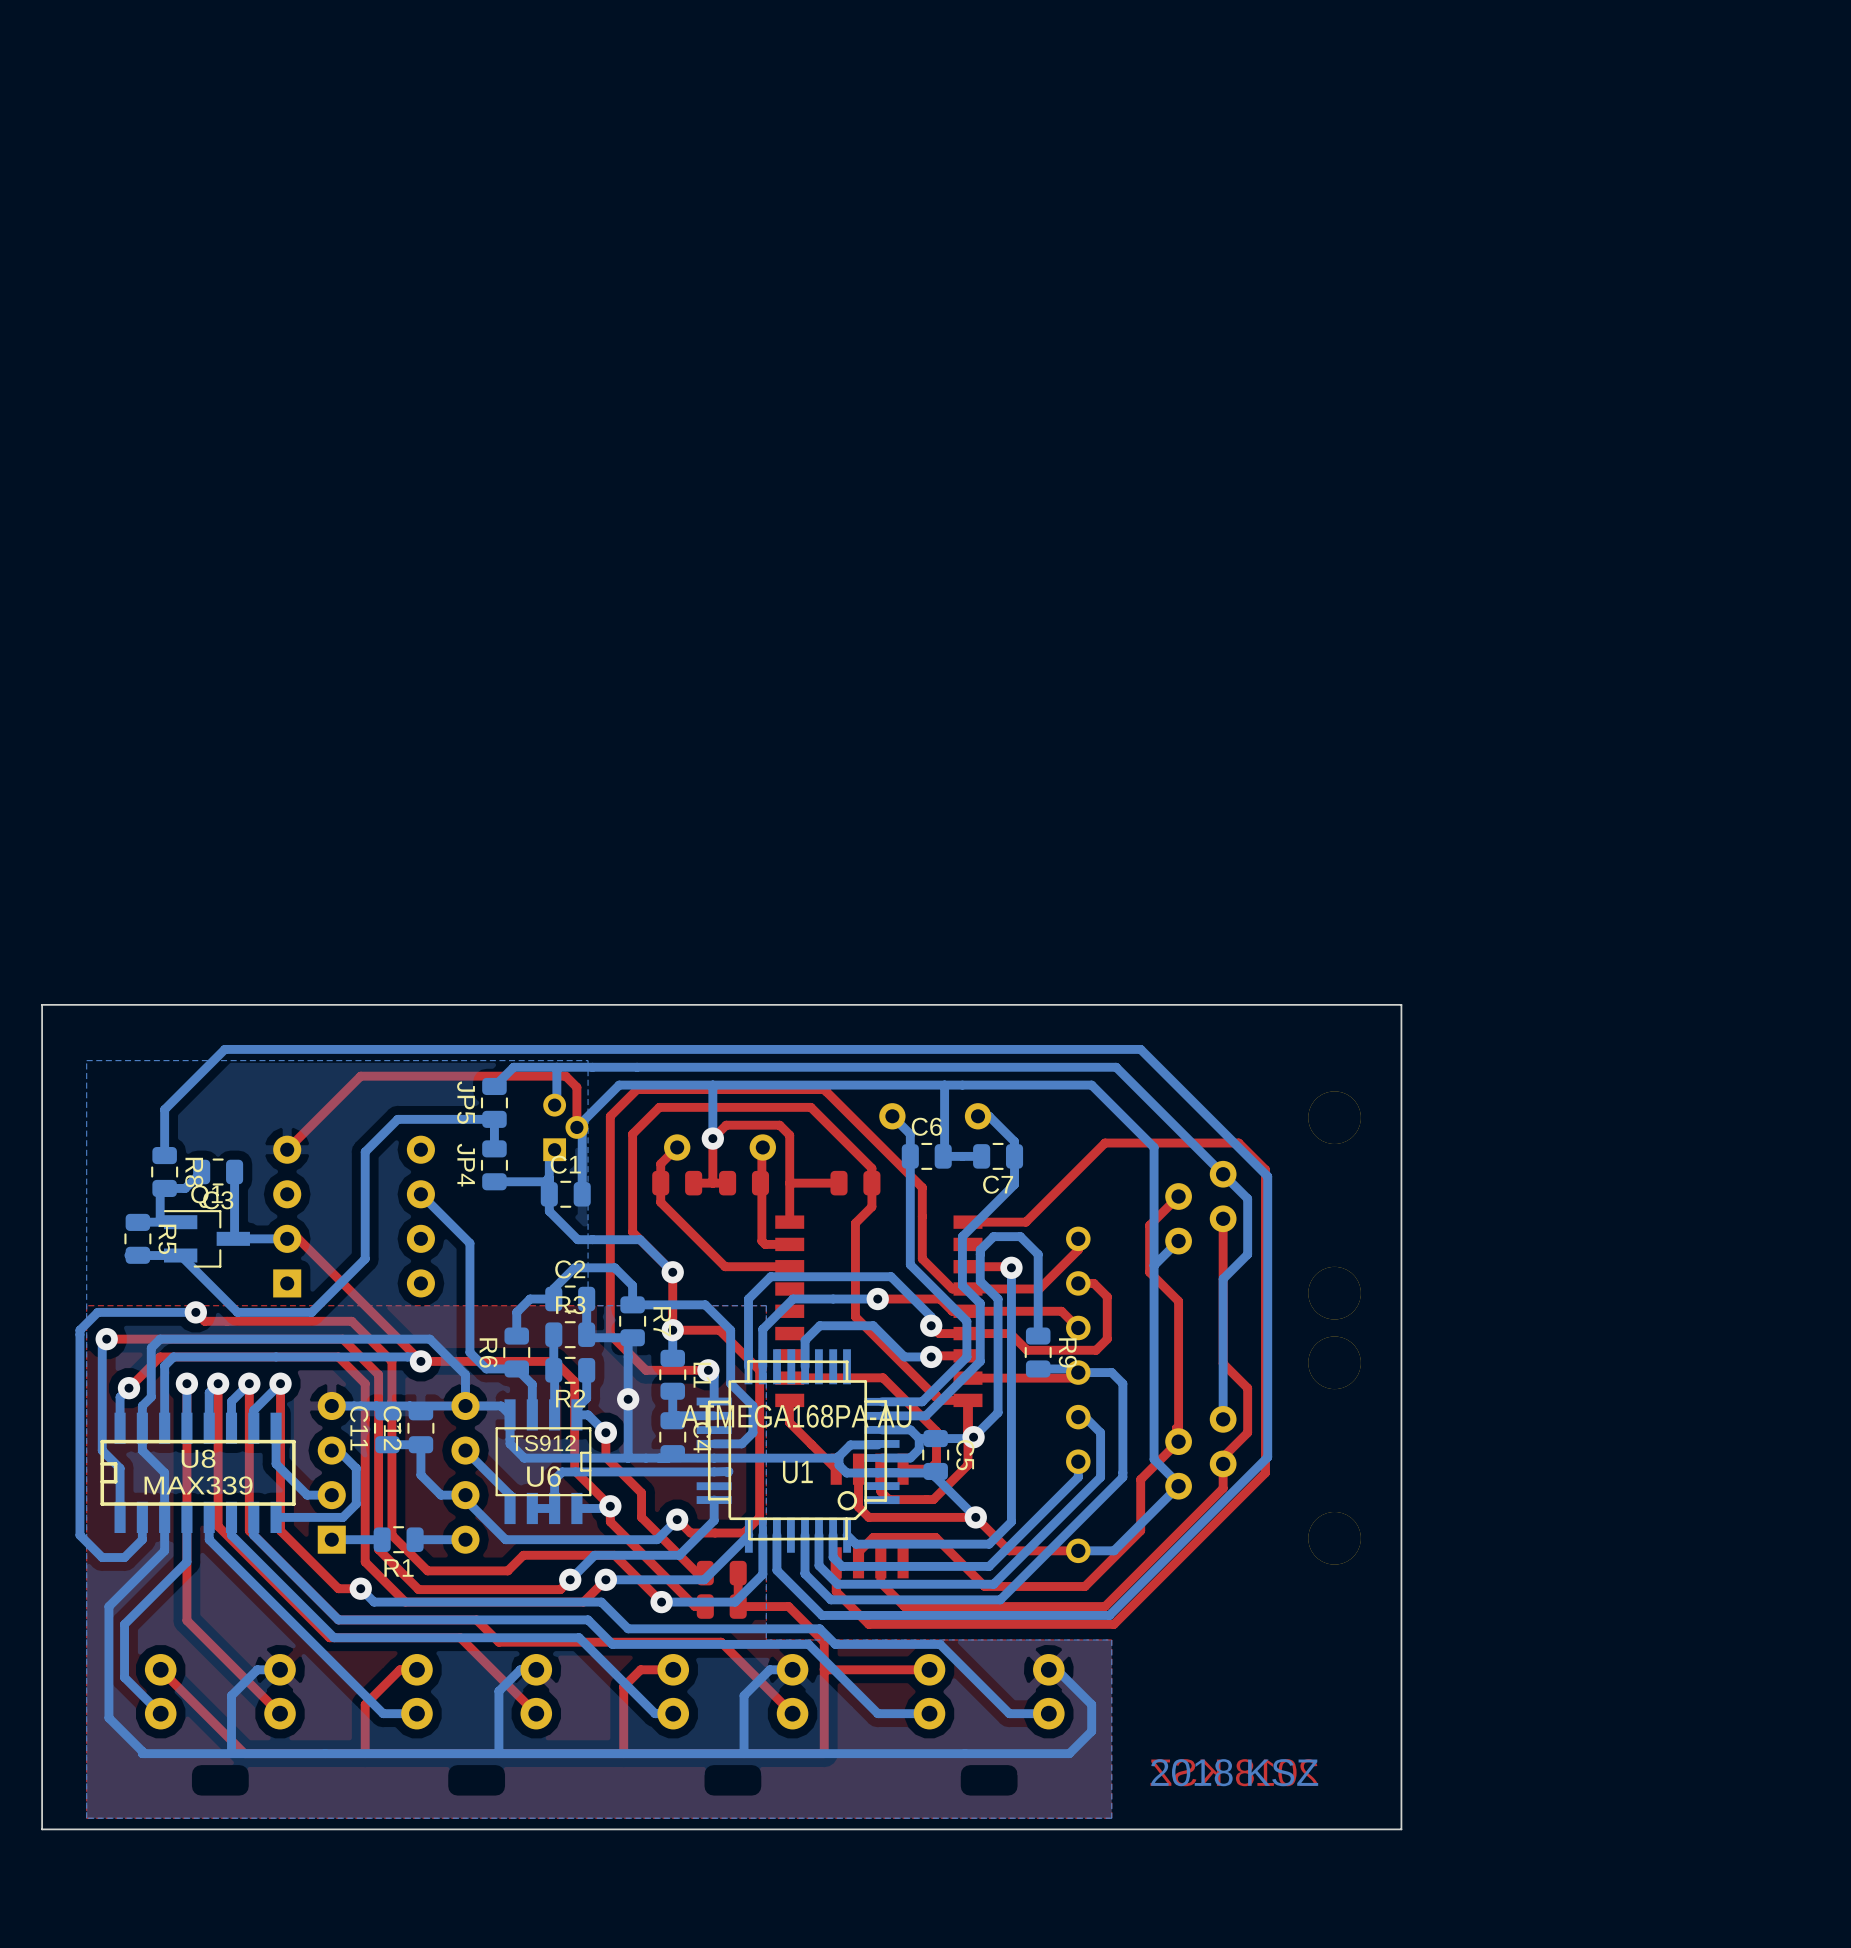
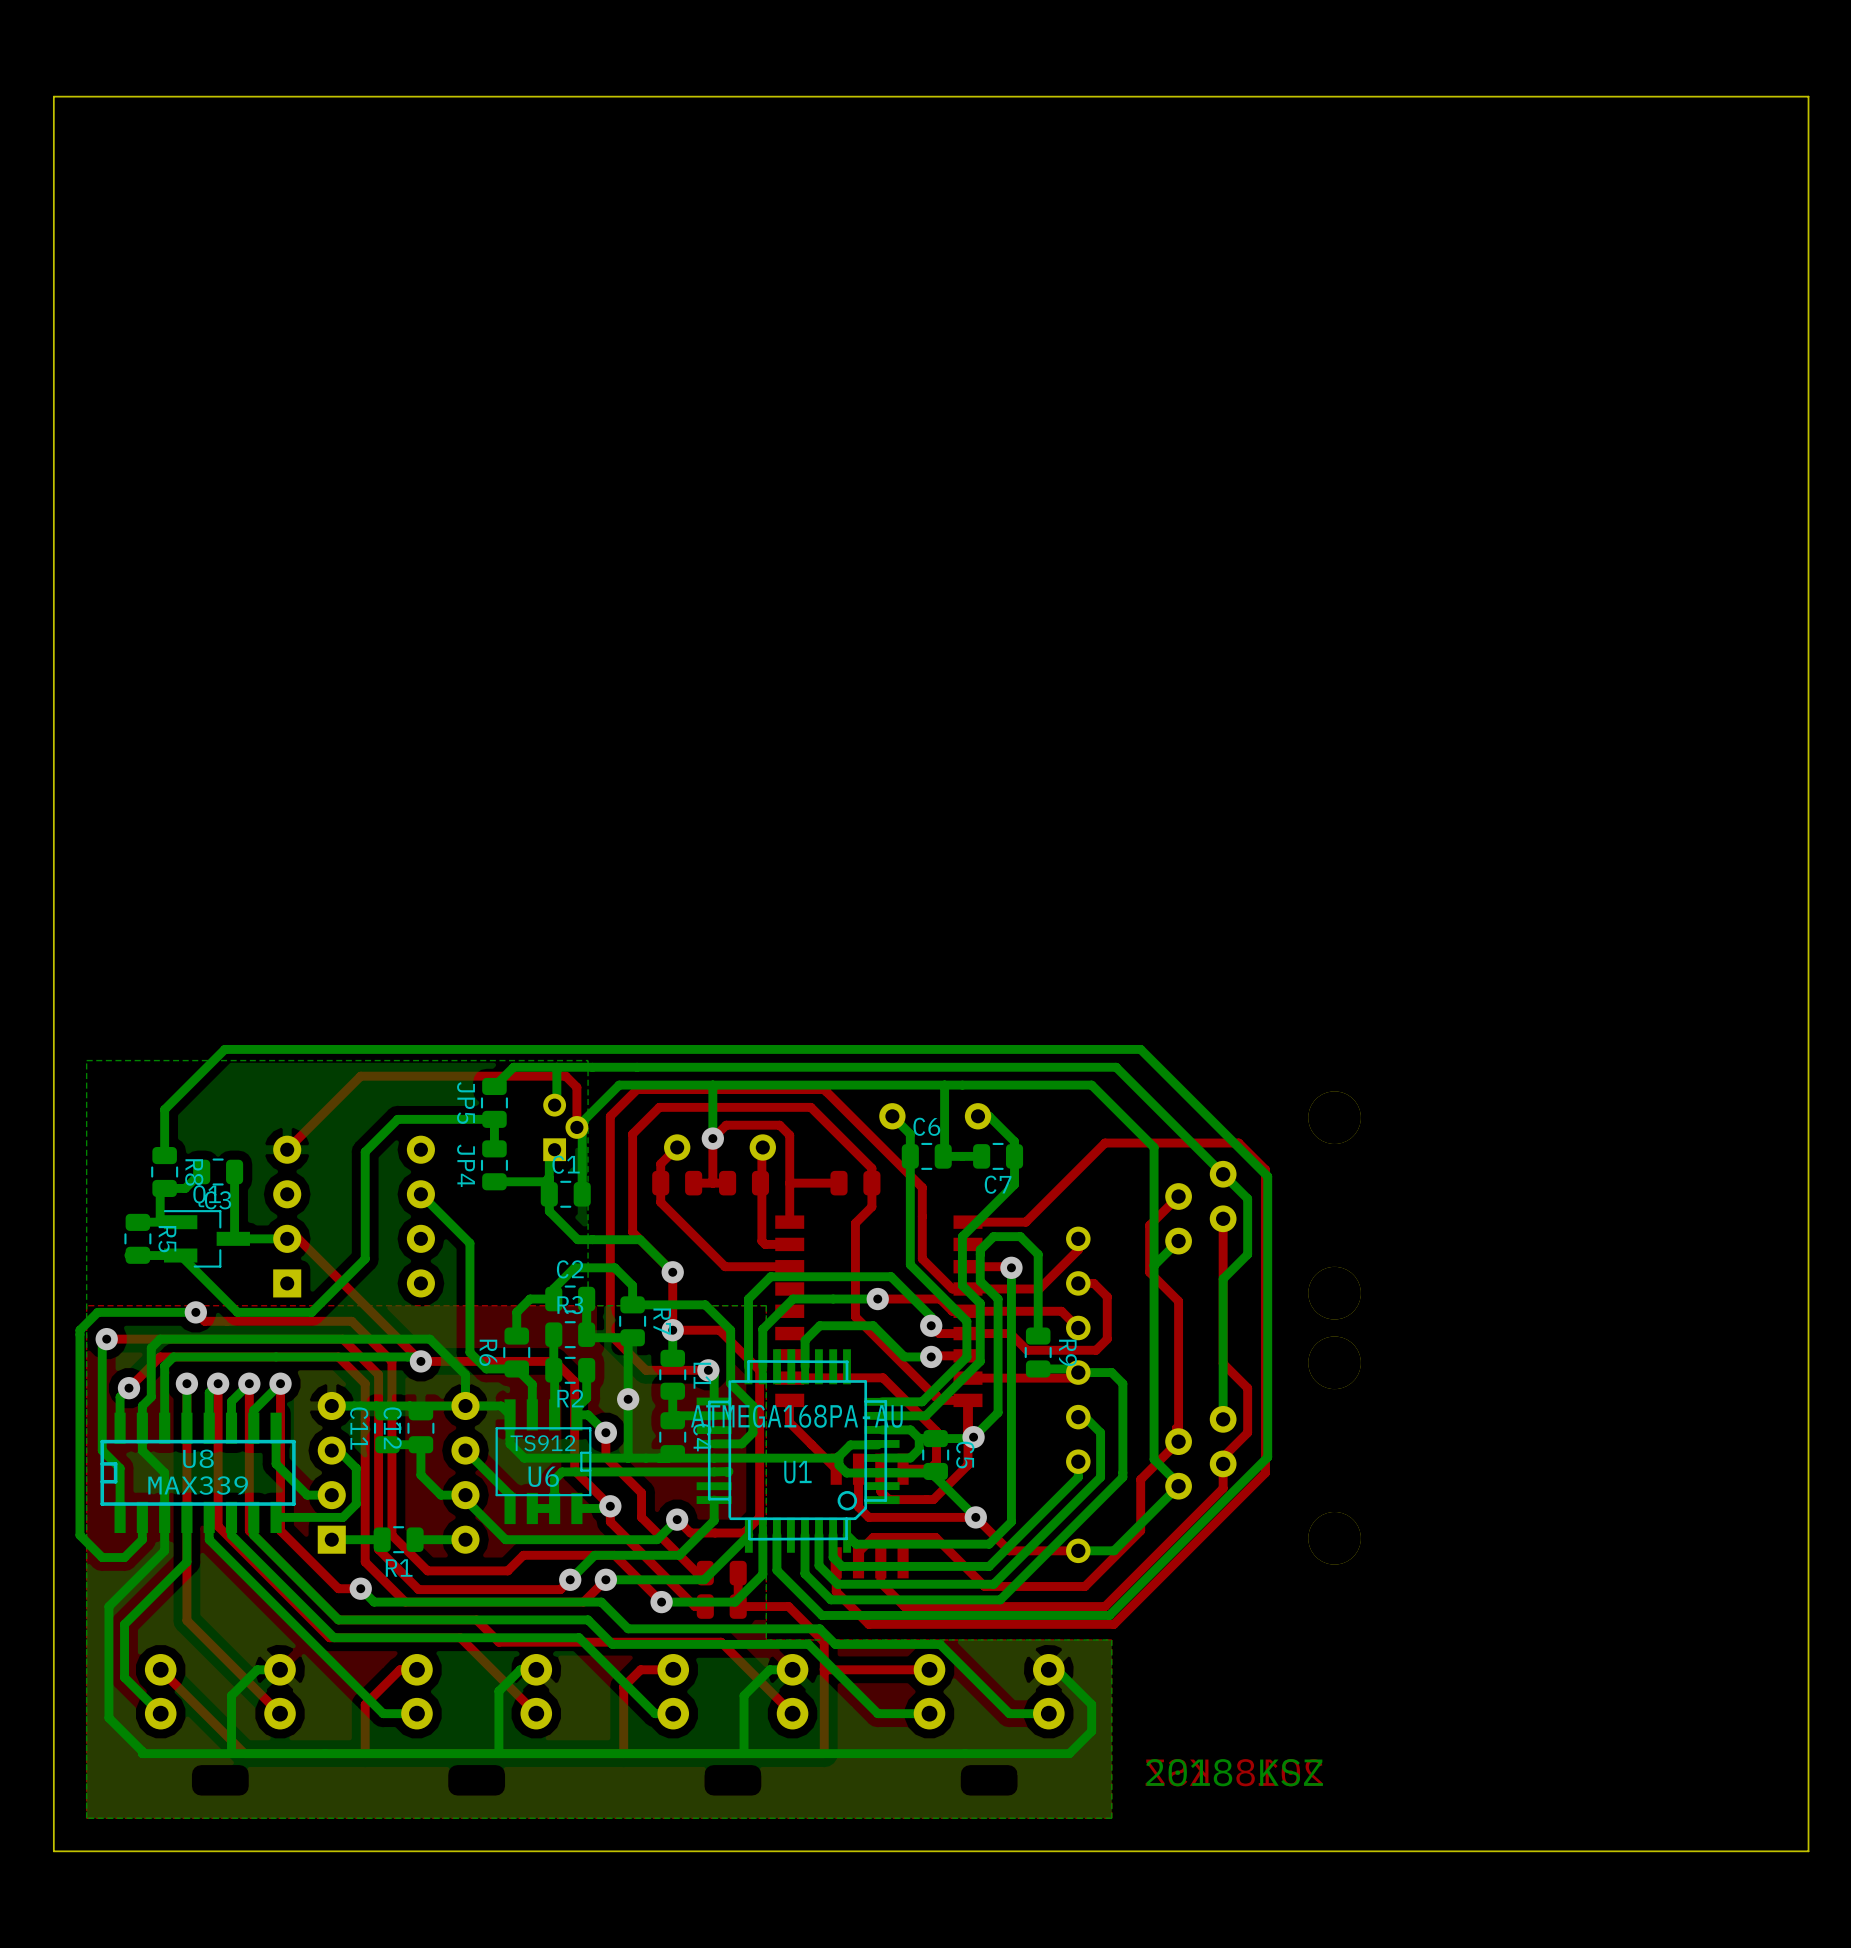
board edge: none -> (1808, 96) (1808, 1851) (53, 1851) (53, 96) (1808, 96)
board edge: (1401, 1004) (42, 1004) (42, 1829) (1401, 1829) (1401, 1004) -> none

